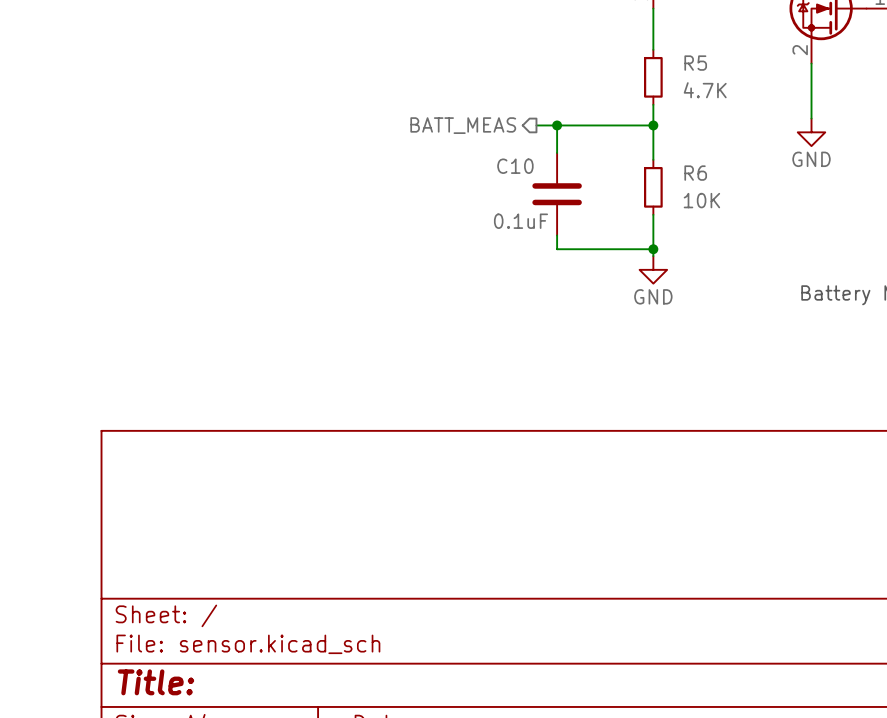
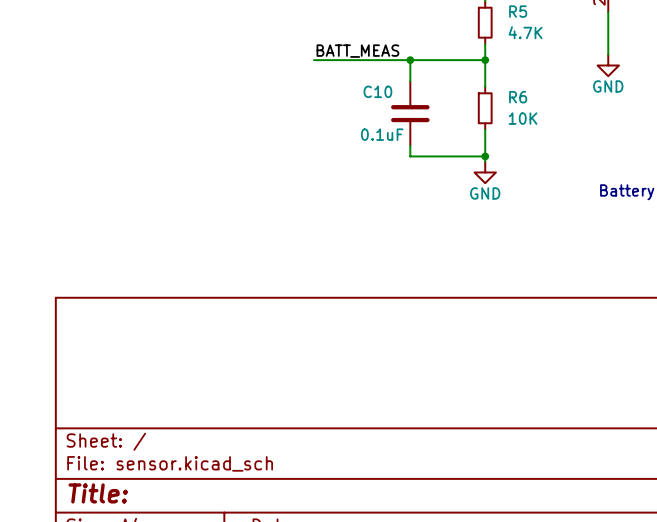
label: none -> BATT_MEAS (357, 51)
wire: none -> (314, 60) (394, 60)
hierarchical label: BATT_MEAS (463, 125) -> none

